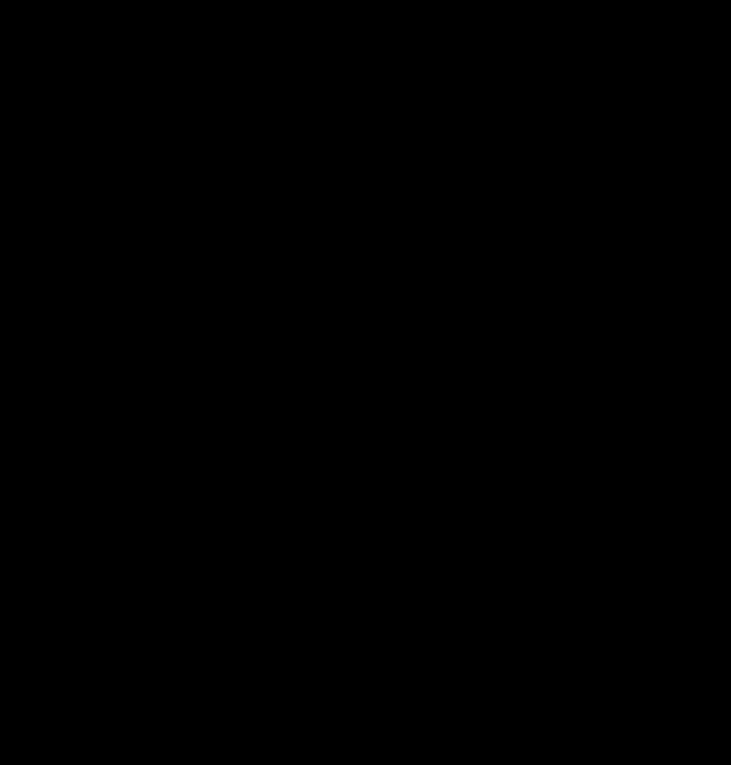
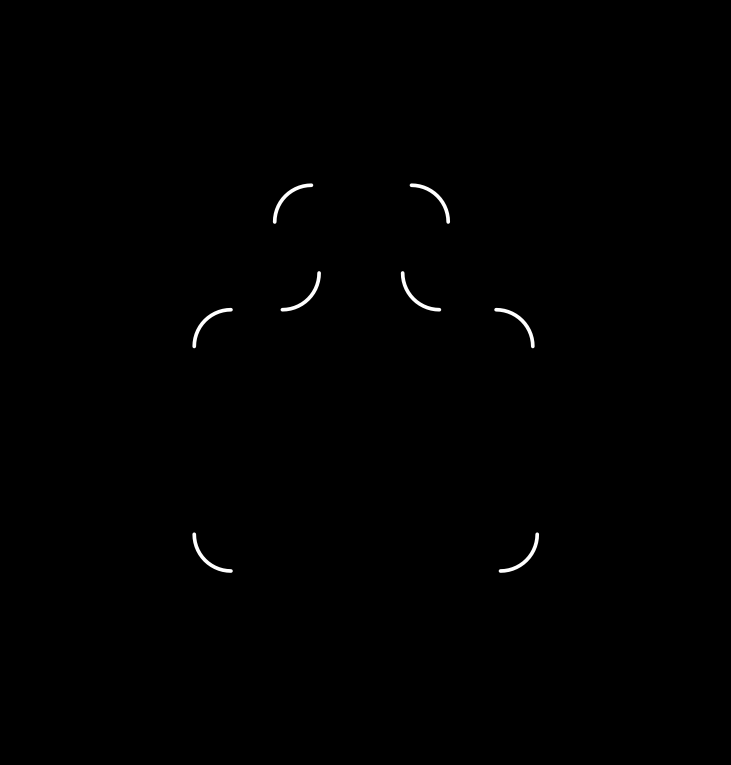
board edge: none -> (311, 185) (295, 188) (285, 196) (276, 209) (274, 221)
board edge: none -> (411, 185) (423, 187) (437, 196) (444, 206) (448, 221)
board edge: none -> (319, 272) (317, 285) (308, 298) (294, 307) (282, 309)
board edge: none -> (402, 272) (404, 285) (413, 298) (427, 307) (439, 309)
board edge: none -> (230, 309) (215, 313) (205, 320) (196, 334) (194, 346)
board edge: none -> (496, 309) (512, 313) (522, 320) (530, 334) (532, 346)
board edge: none -> (194, 534) (197, 550) (205, 560) (215, 567) (230, 571)
board edge: none -> (537, 534) (533, 550) (526, 560) (516, 567) (500, 571)

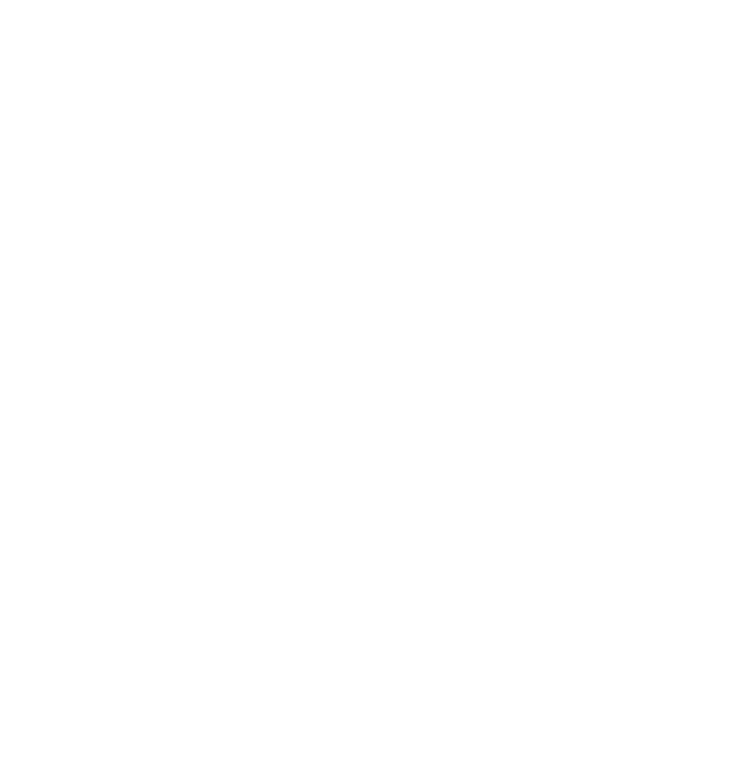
board edge: (311, 185) (295, 188) (285, 196) (276, 209) (274, 221) -> none
board edge: (411, 185) (423, 187) (437, 196) (444, 206) (448, 221) -> none
board edge: (319, 272) (317, 285) (308, 298) (294, 307) (282, 309) -> none
board edge: (402, 272) (404, 285) (413, 298) (427, 307) (439, 309) -> none
board edge: (230, 309) (215, 313) (205, 320) (196, 334) (194, 346) -> none
board edge: (496, 309) (512, 313) (522, 320) (530, 334) (532, 346) -> none
board edge: (194, 534) (197, 550) (205, 560) (215, 567) (230, 571) -> none
board edge: (537, 534) (533, 550) (526, 560) (516, 567) (500, 571) -> none

